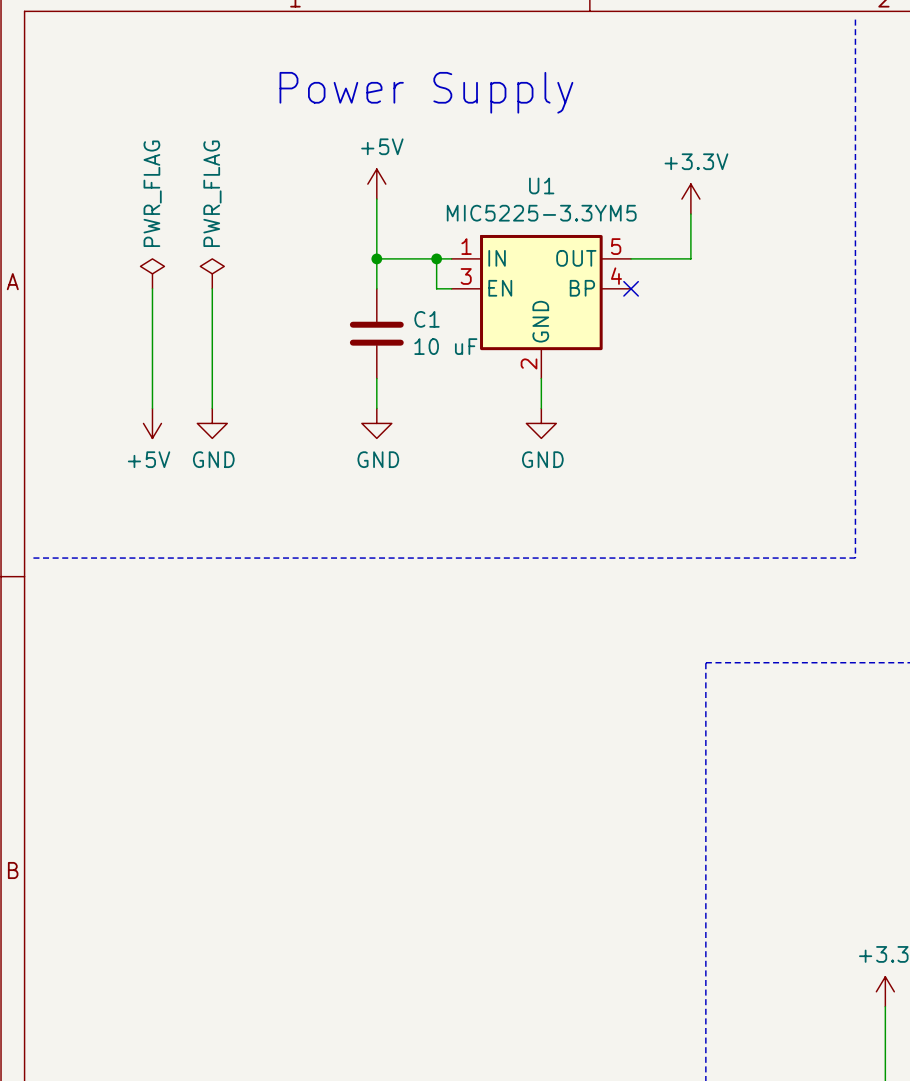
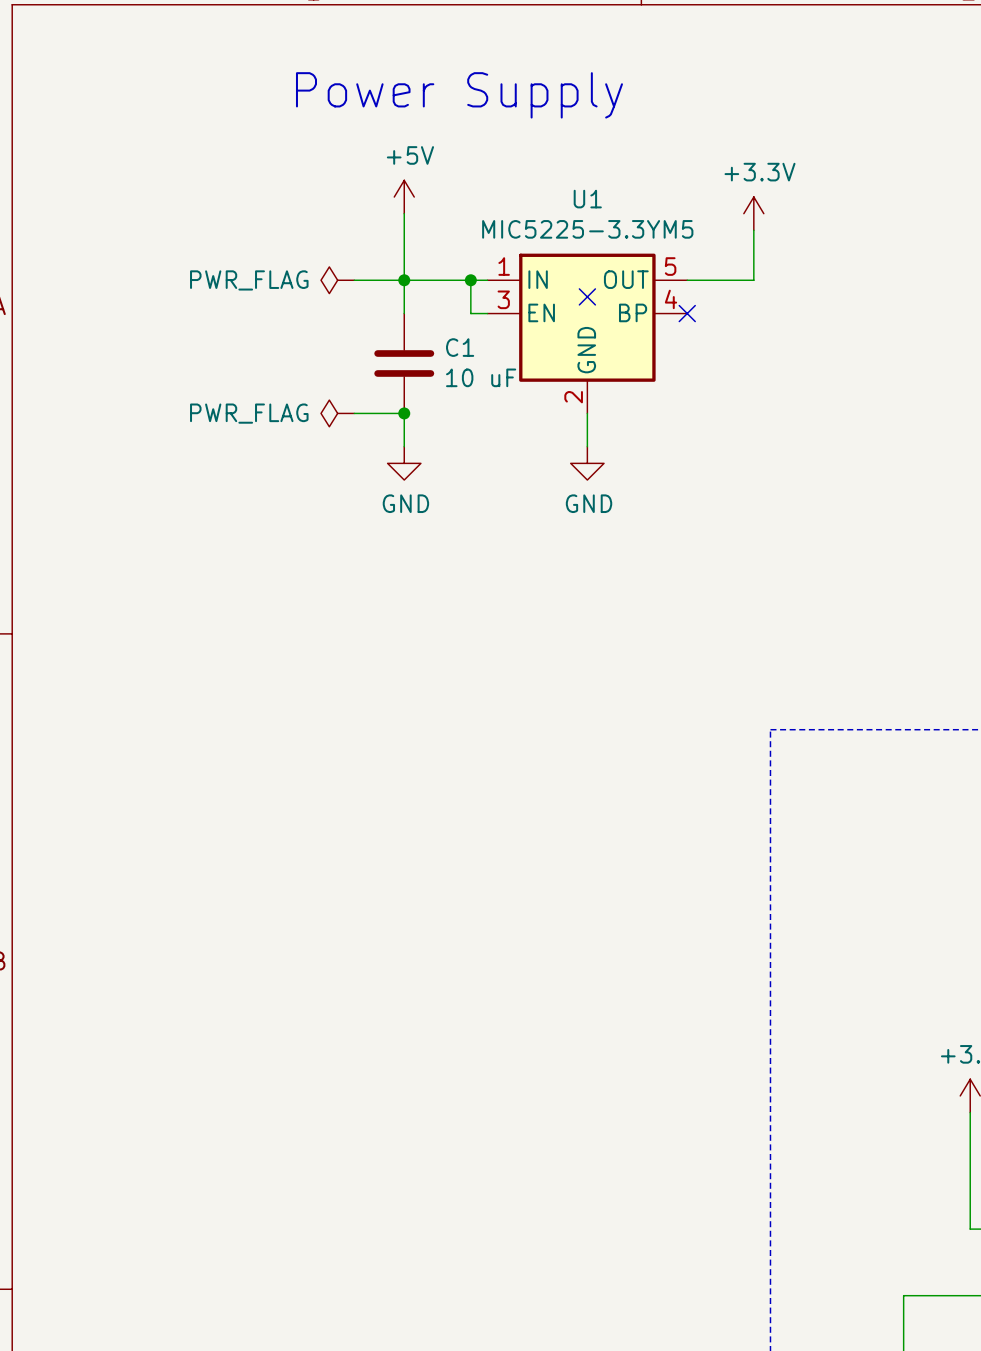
line: (855, 19) (855, 558) (32, 558) -> none
power symbol: none -> PWR_FLAG (337, 280)
wire: none -> (354, 280) (404, 280)
power symbol: PWR_FLAG (152, 273) -> none
power symbol: PWR_FLAG (212, 273) -> none
no-connect mark: none -> (587, 296)
wire: (152, 288) (152, 408) -> none
wire: (212, 288) (212, 408) -> none
power symbol: none -> PWR_FLAG (337, 413)
wire: none -> (354, 413) (404, 413)
junction: none -> (404, 413)
power symbol: +5V (152, 423) -> none
power symbol: GND (212, 423) -> none

